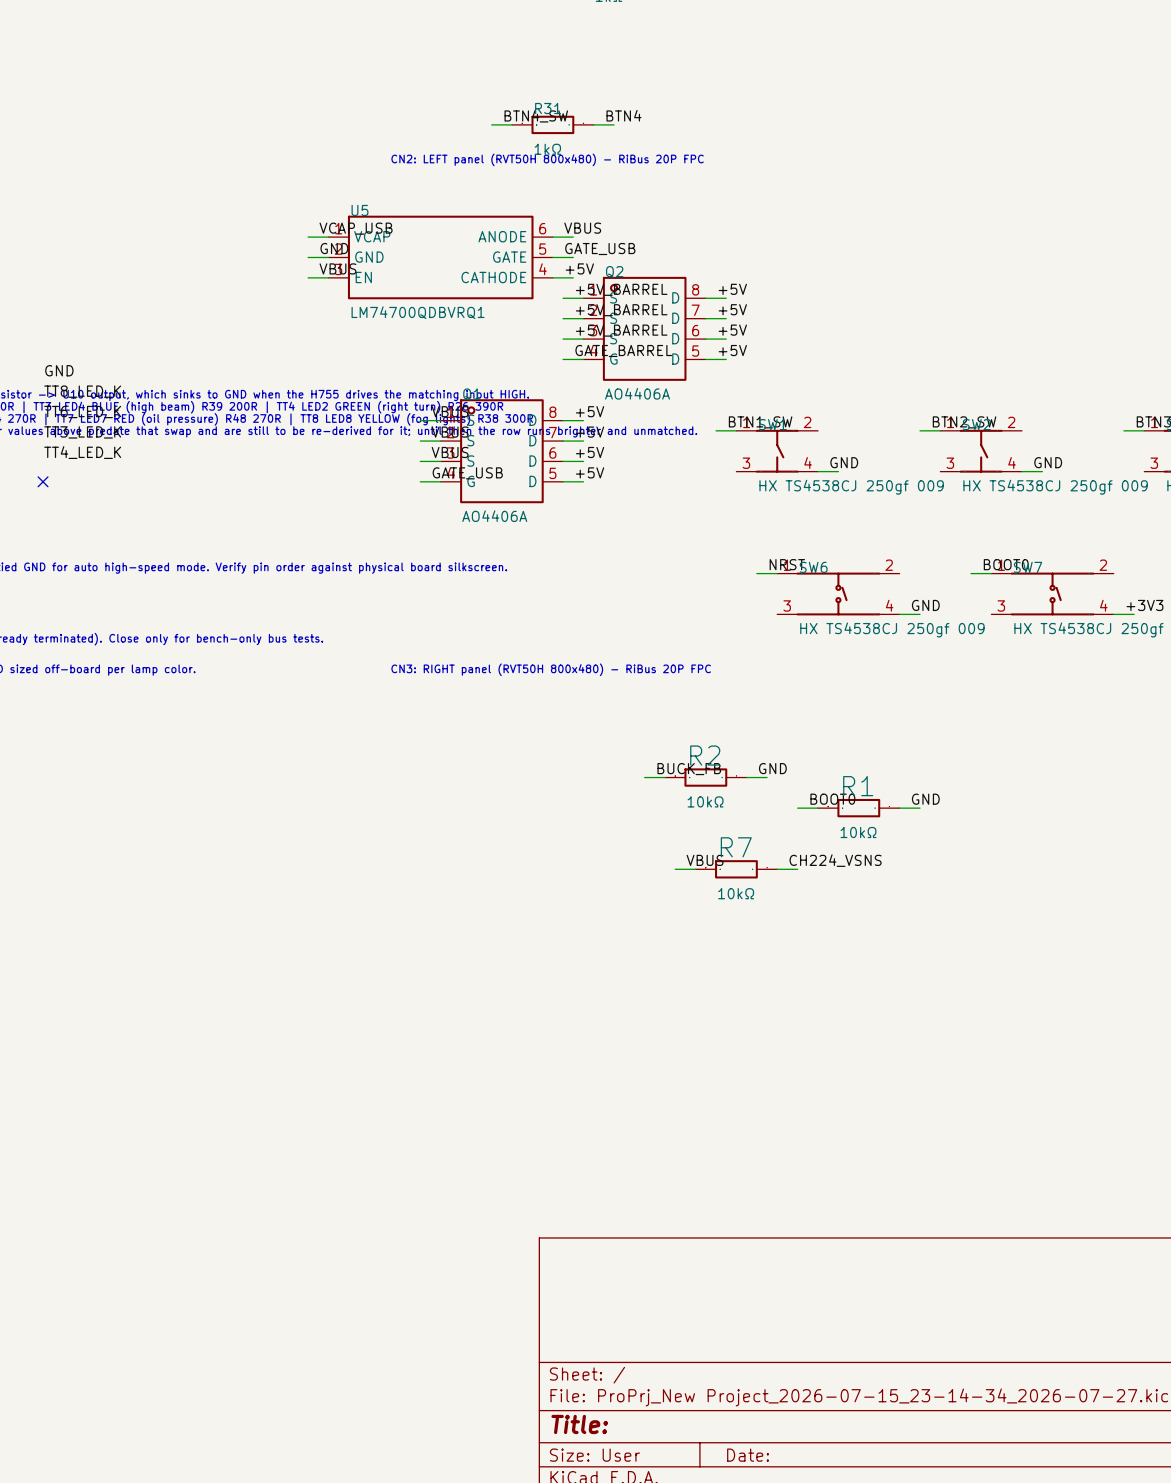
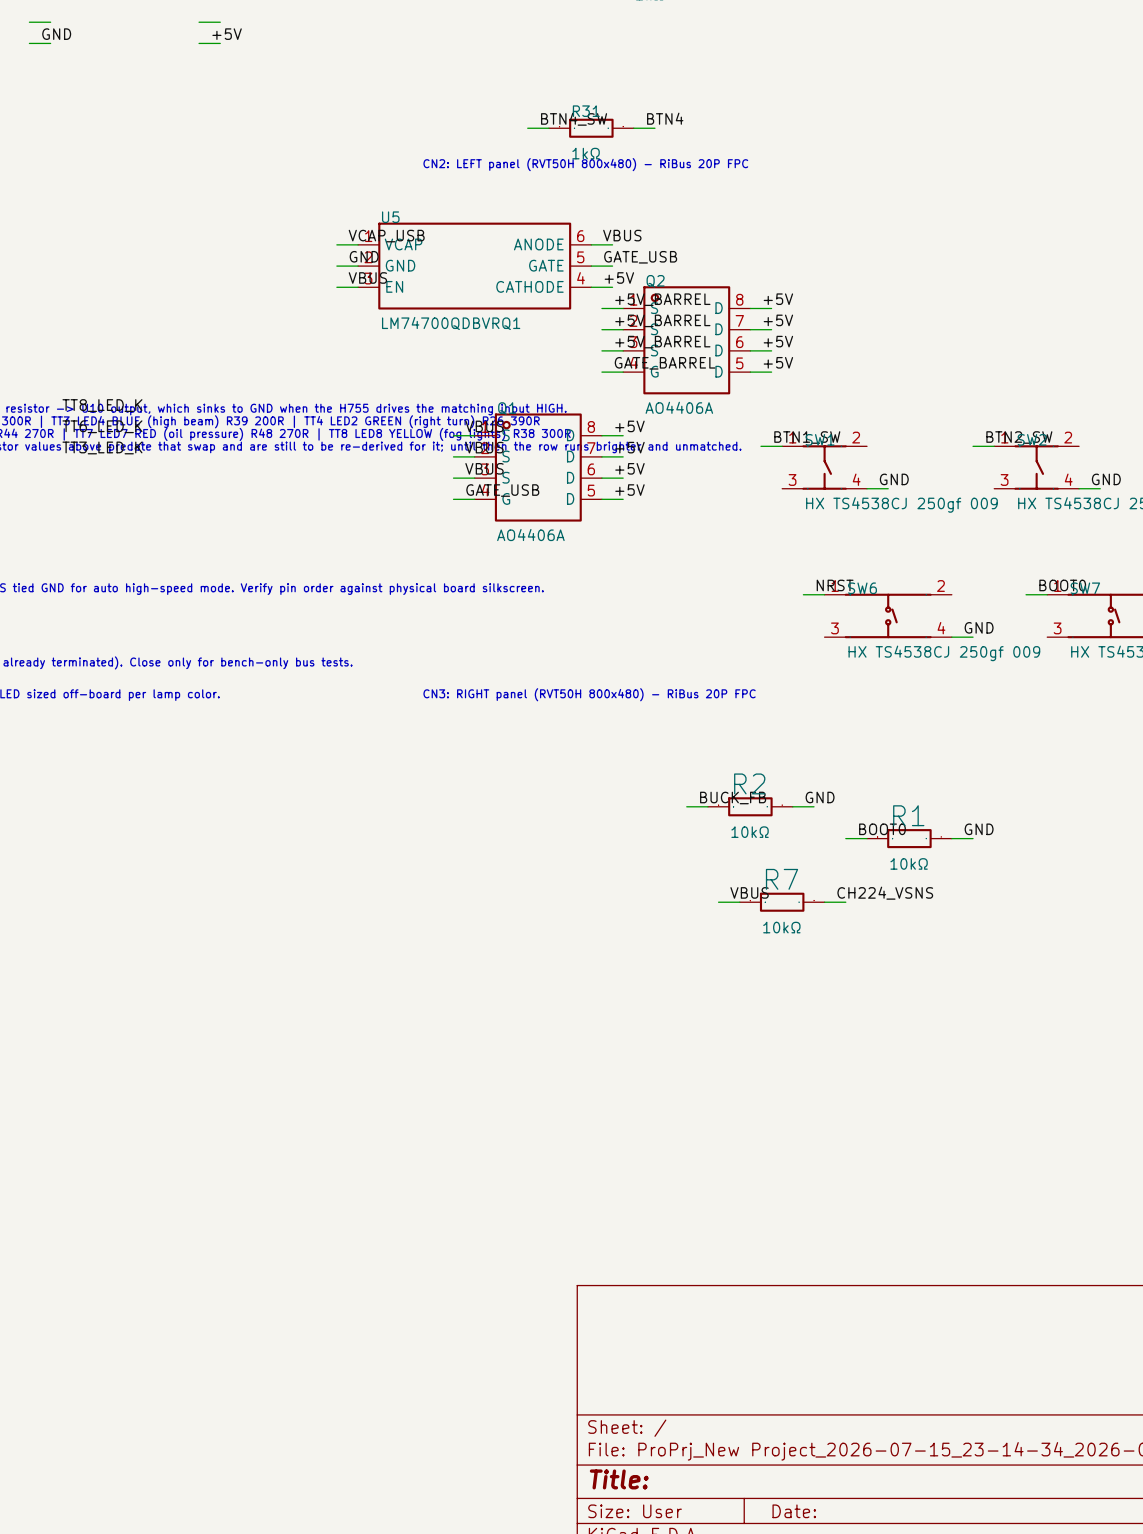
wire: none -> (29, 22) (50, 22)
wire: none -> (199, 22) (220, 22)
label: none -> GND (56, 34)
label: none -> +5V (227, 34)
wire: none -> (29, 43) (50, 43)
wire: none -> (199, 43) (220, 43)
label: GND (59, 370) -> none
label: TT4_LED_K (82, 452) -> none
no-connect mark: (43, 481) -> none

